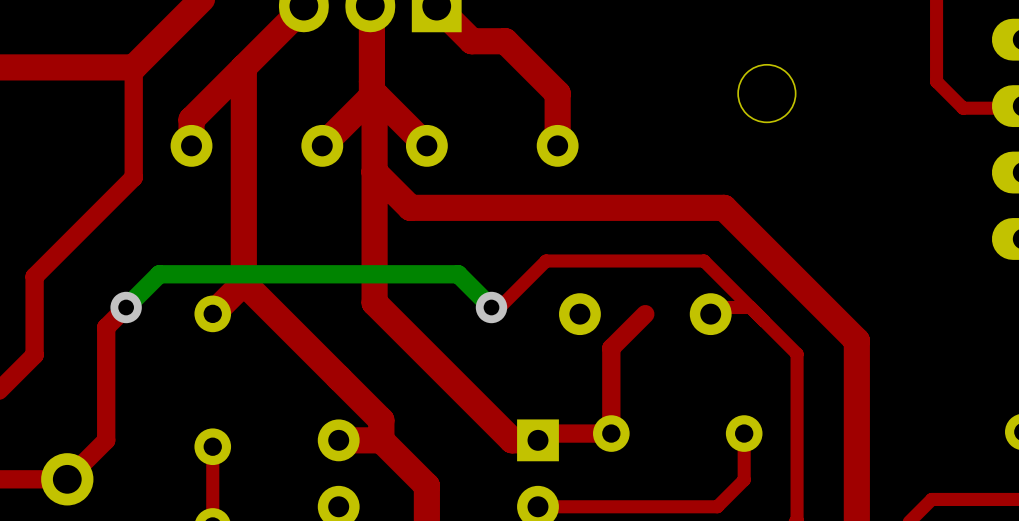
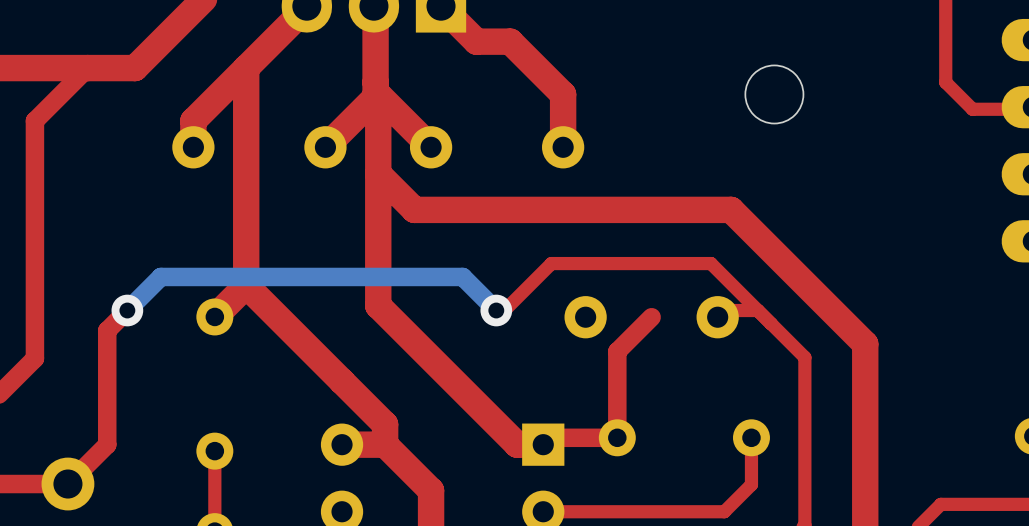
top track: (133, 67) (133, 177) (34, 276) -> (87, 68) (34, 120) (34, 279)

